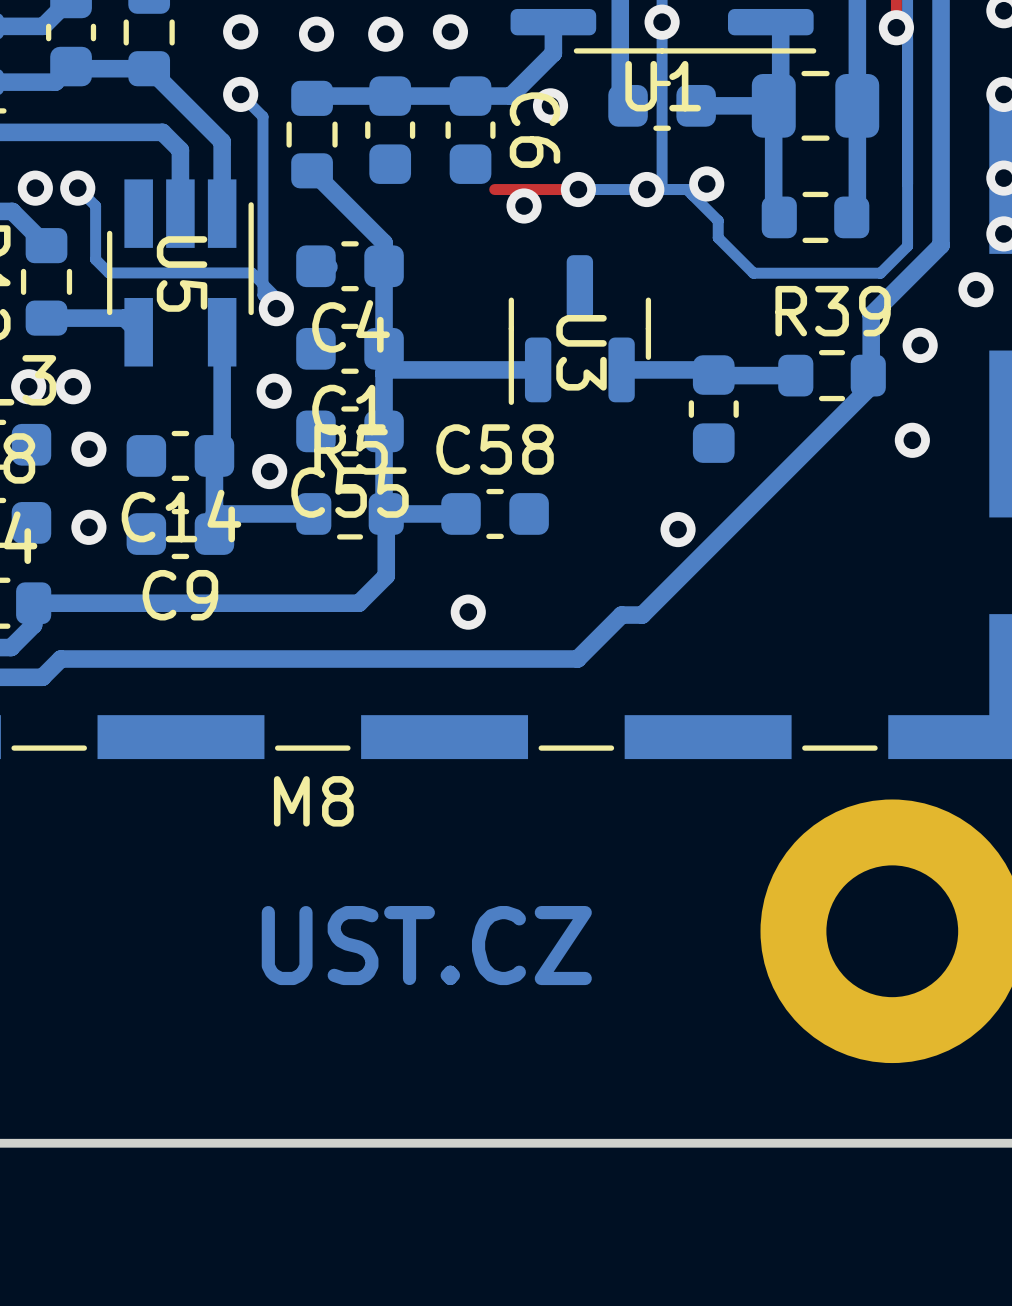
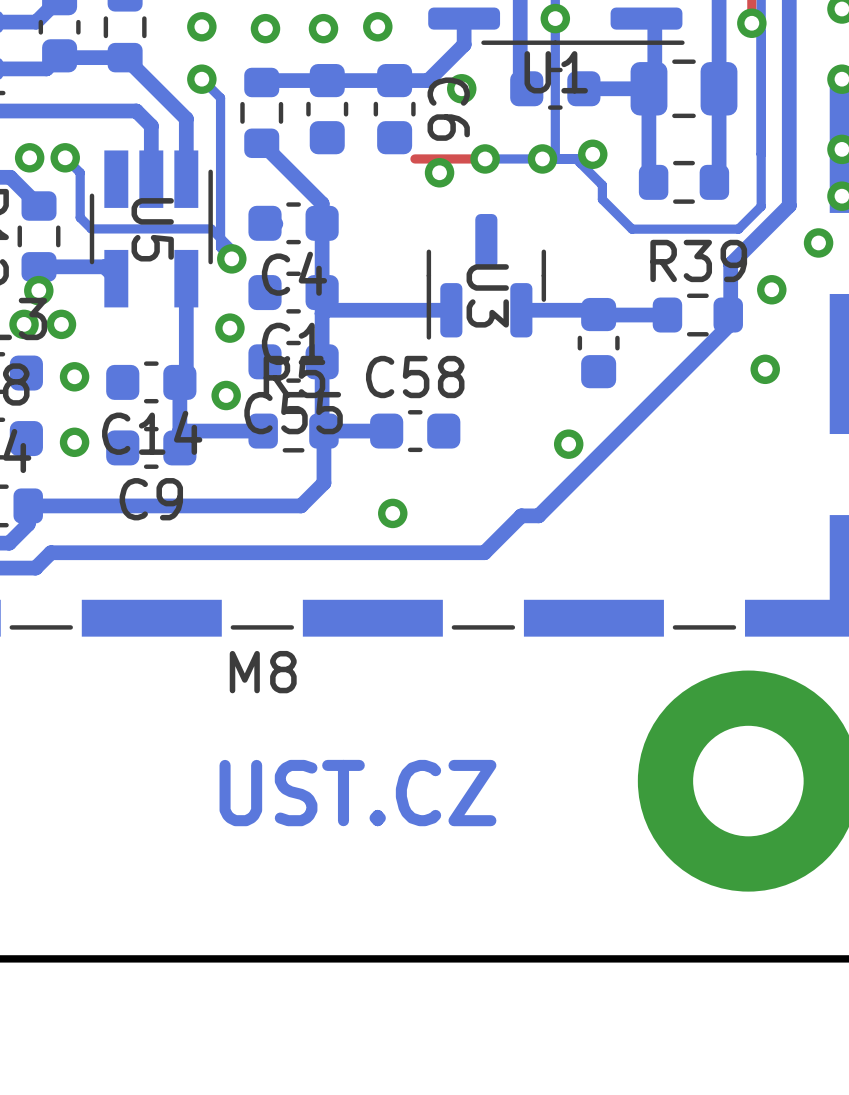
via: none -> (38, 290)

